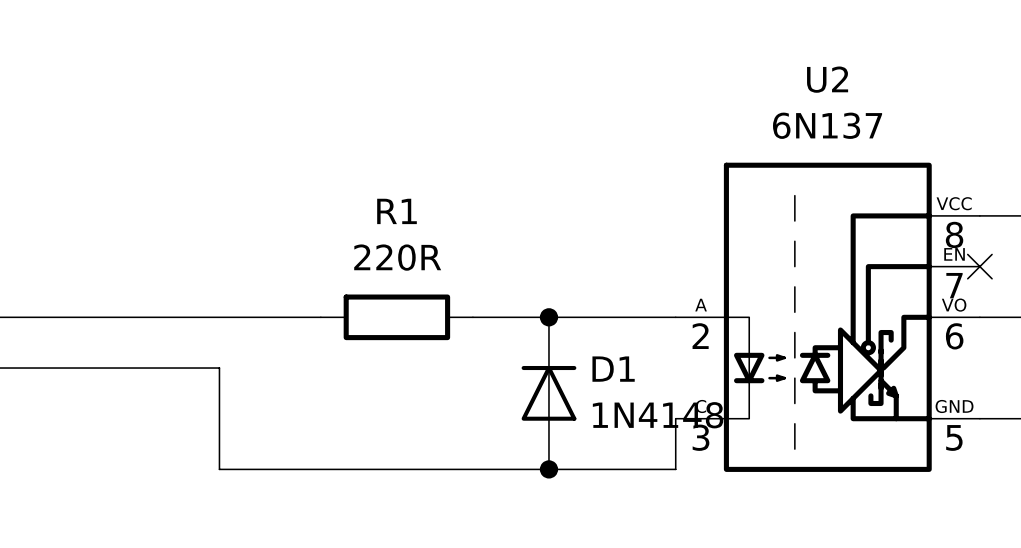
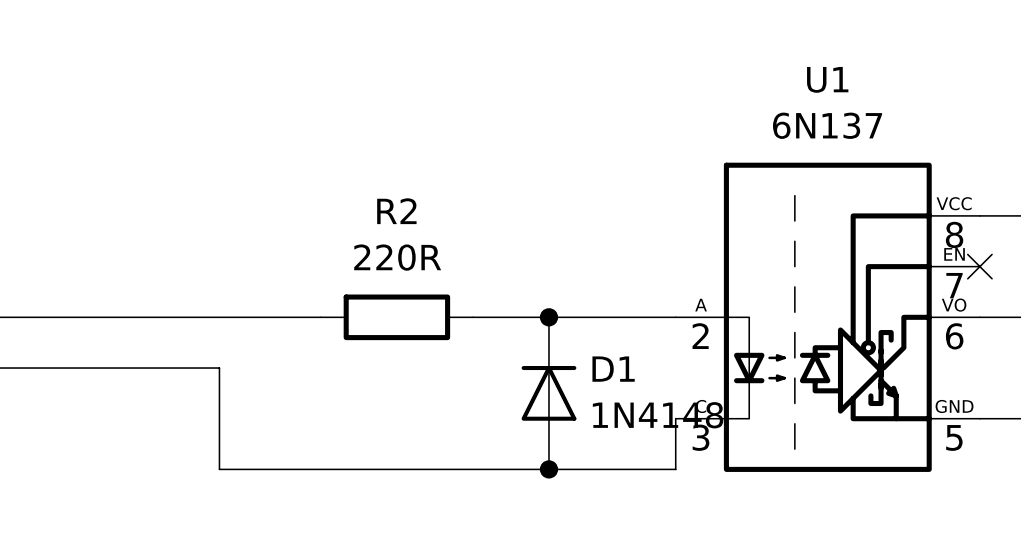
U2 name: U2 (827, 79) -> U1 (827, 79)
R1 name: R1 (397, 211) -> R2 (396, 211)

